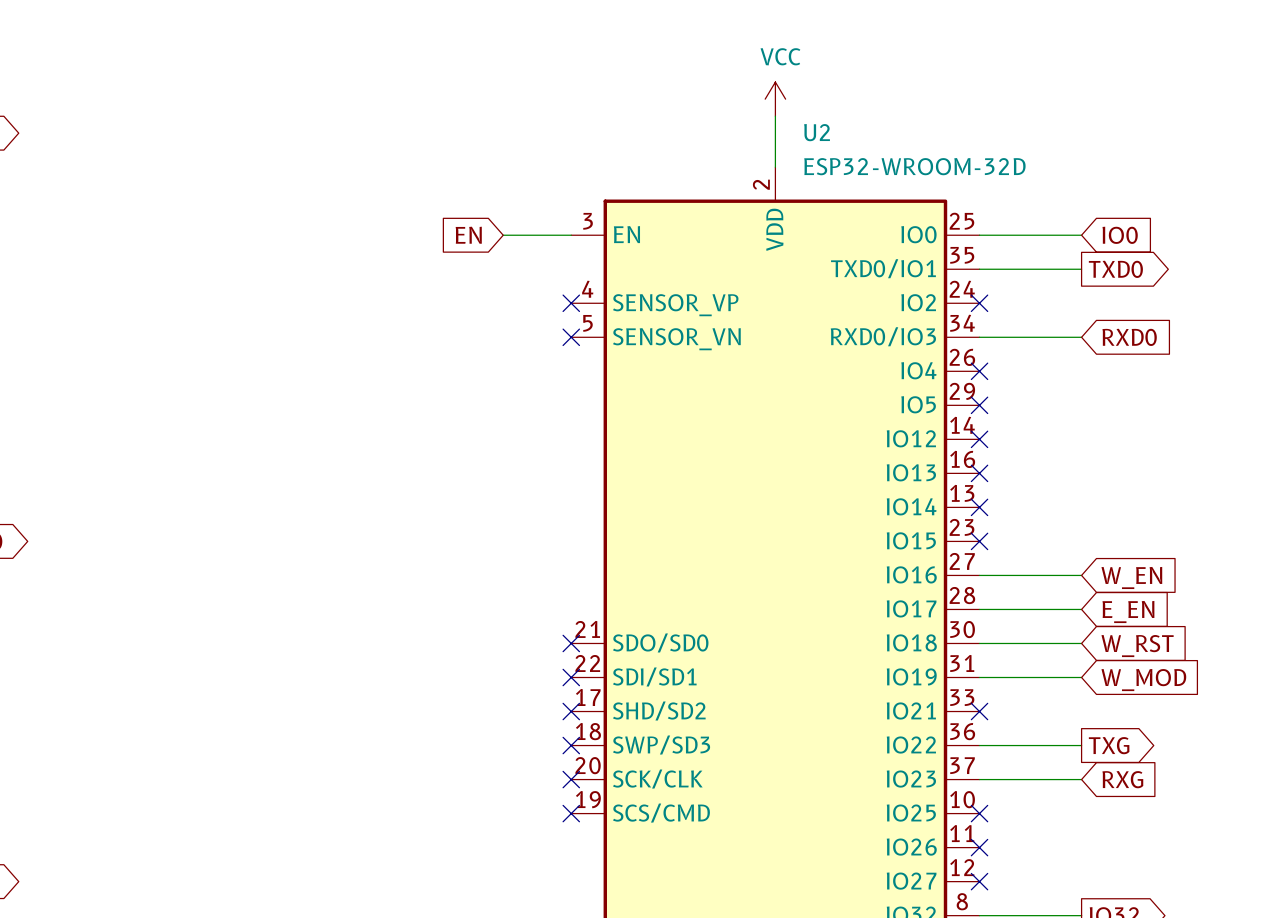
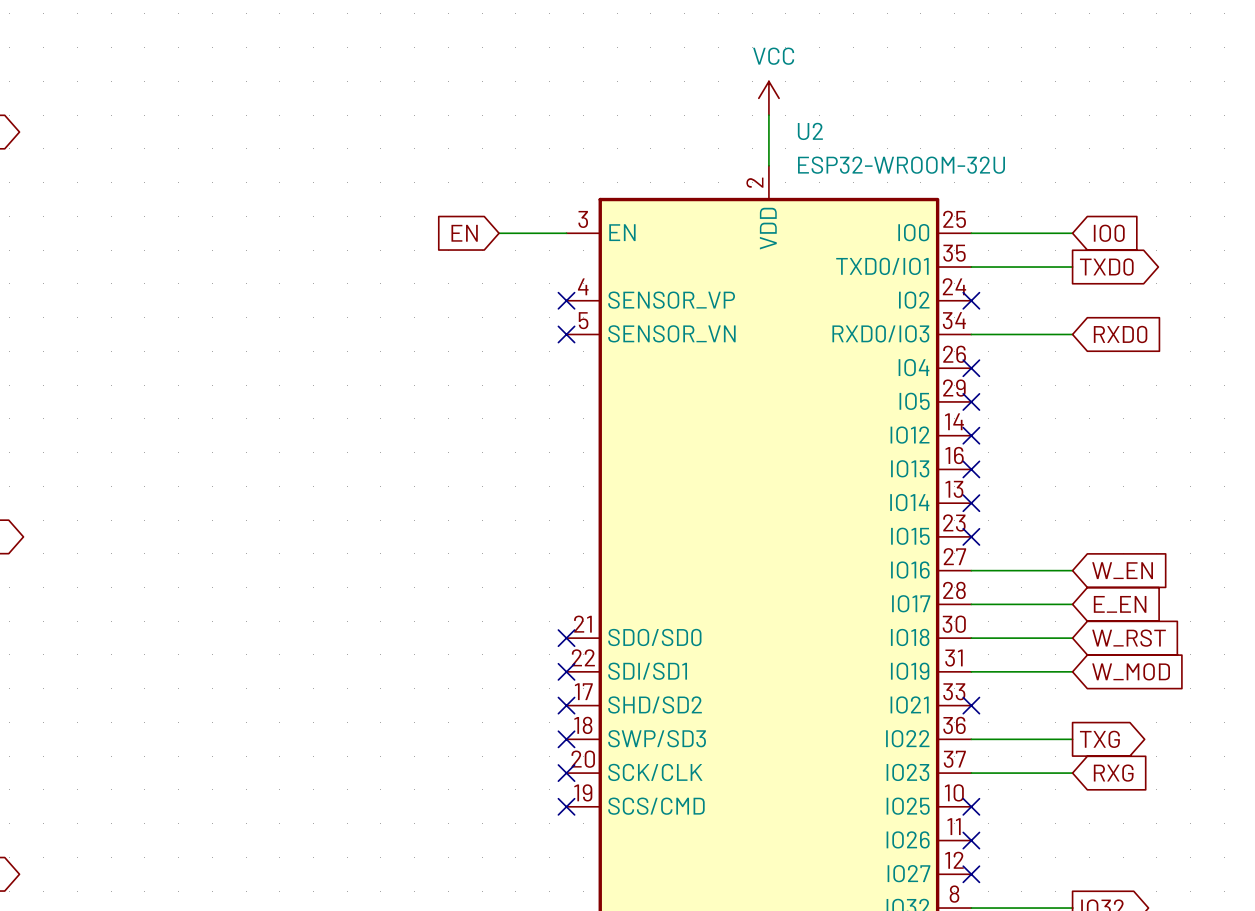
U2 value: ESP32-WROOM-32D (914, 166) -> ESP32-WROOM-32U (901, 165)

